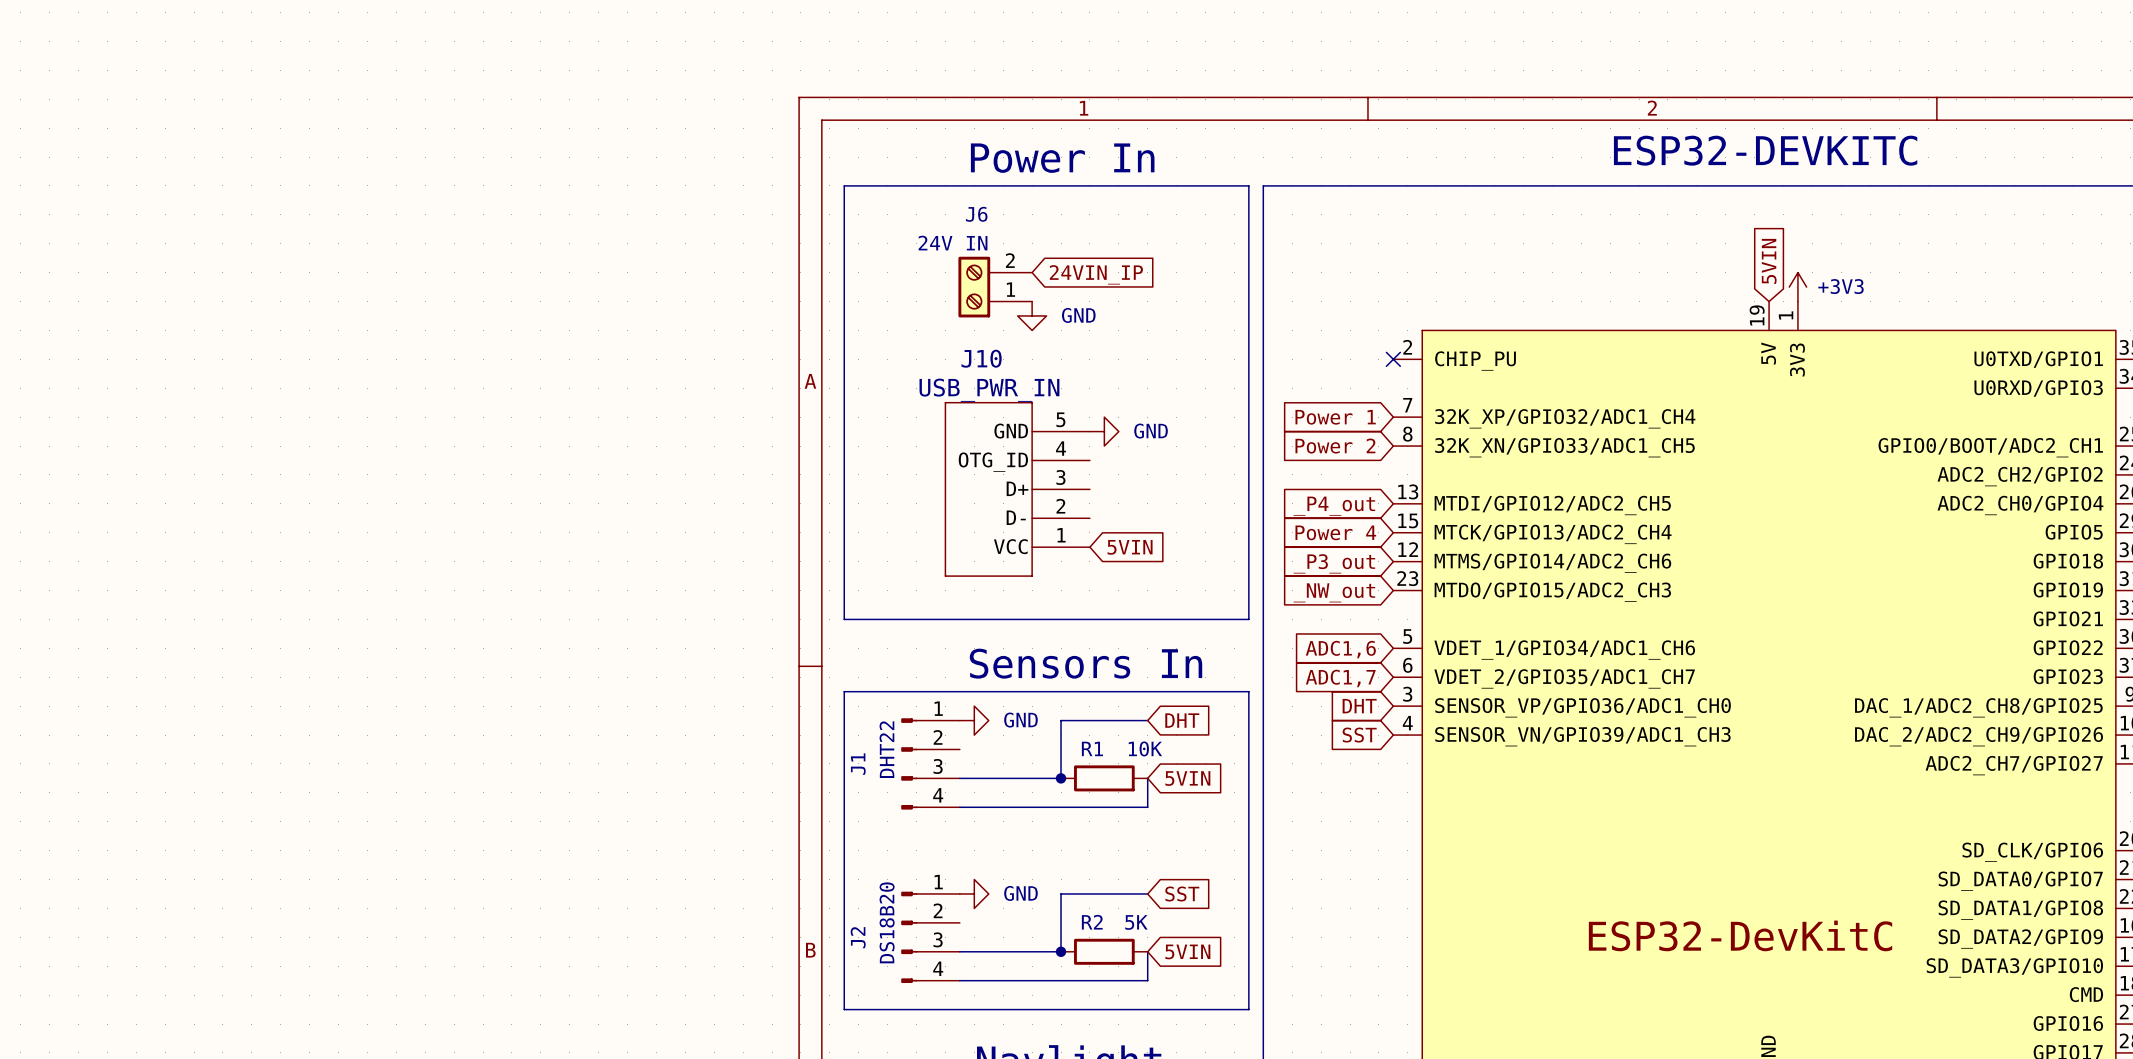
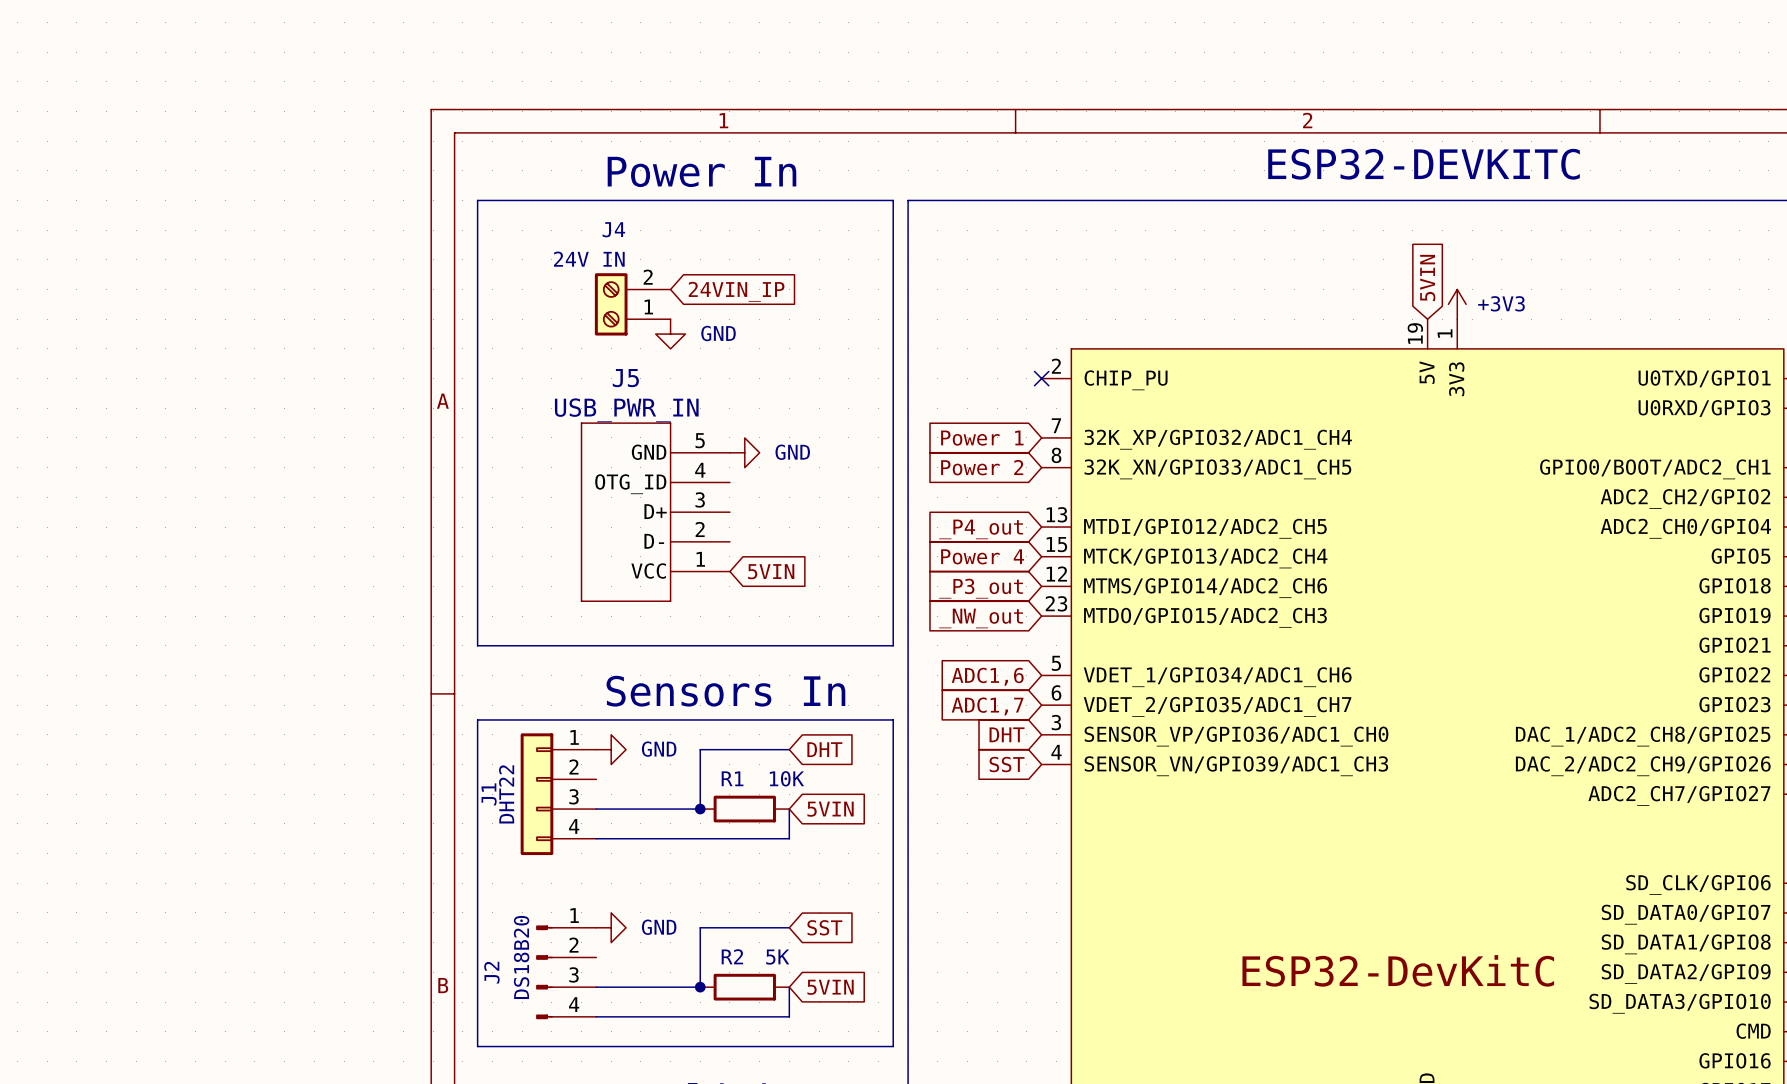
J6 name: J6 (976, 214) -> J4 (613, 229)
J10 name: J10 (981, 358) -> J5 (625, 378)
J1 symbol: [901, 718, 960, 810] -> [520, 733, 597, 856]

